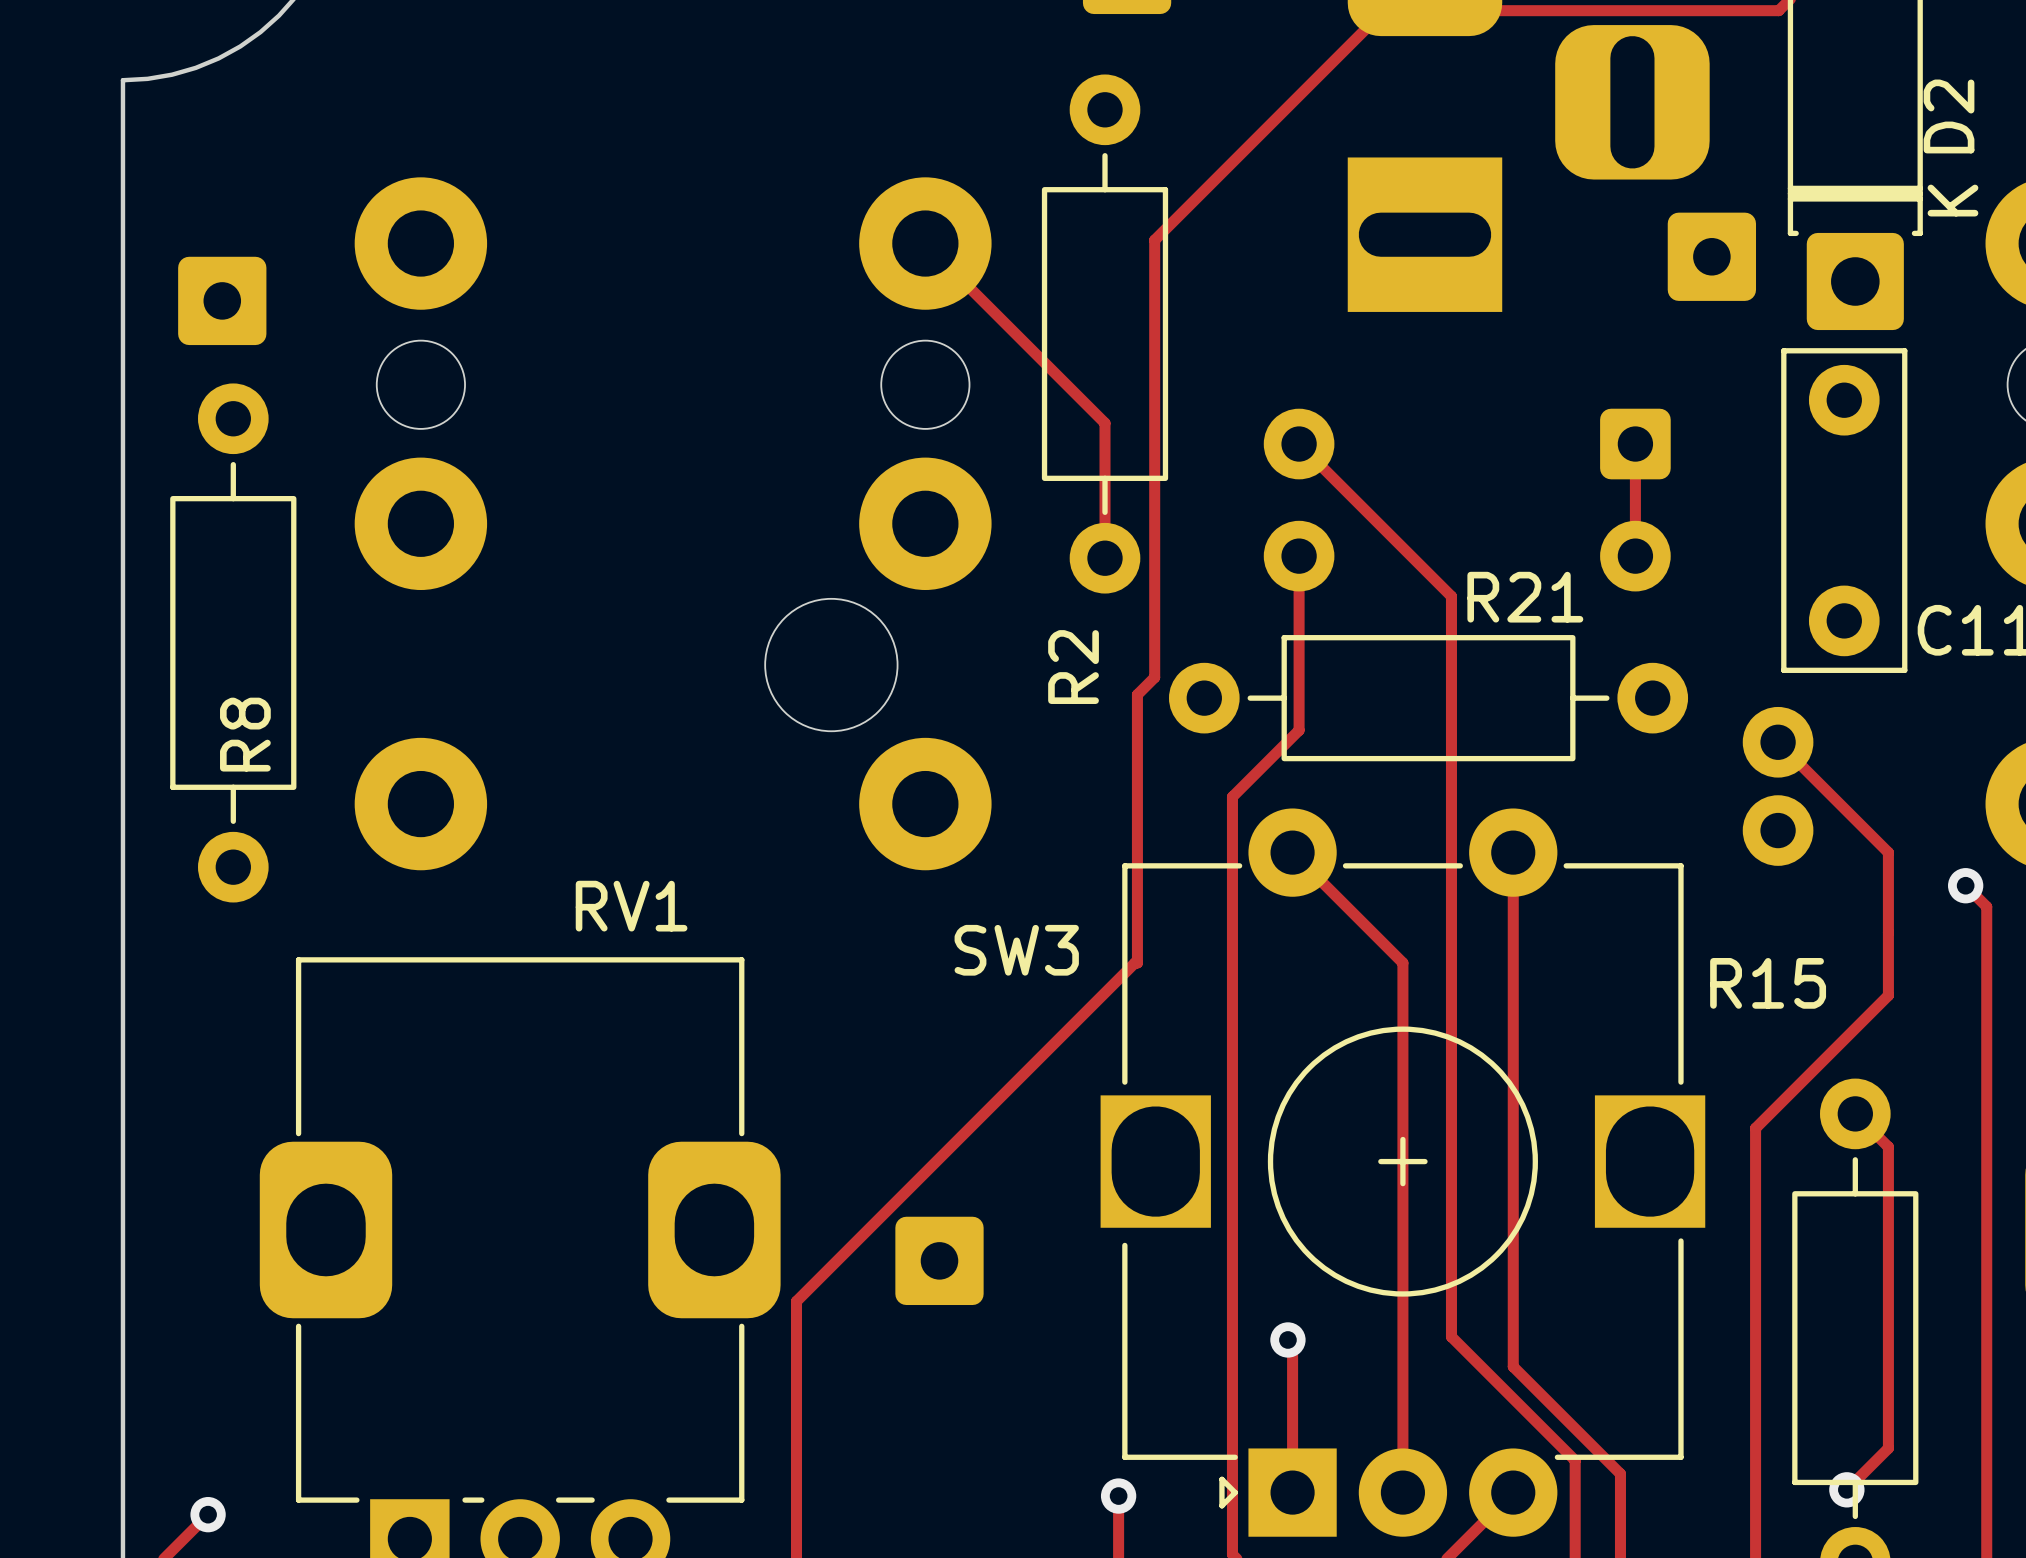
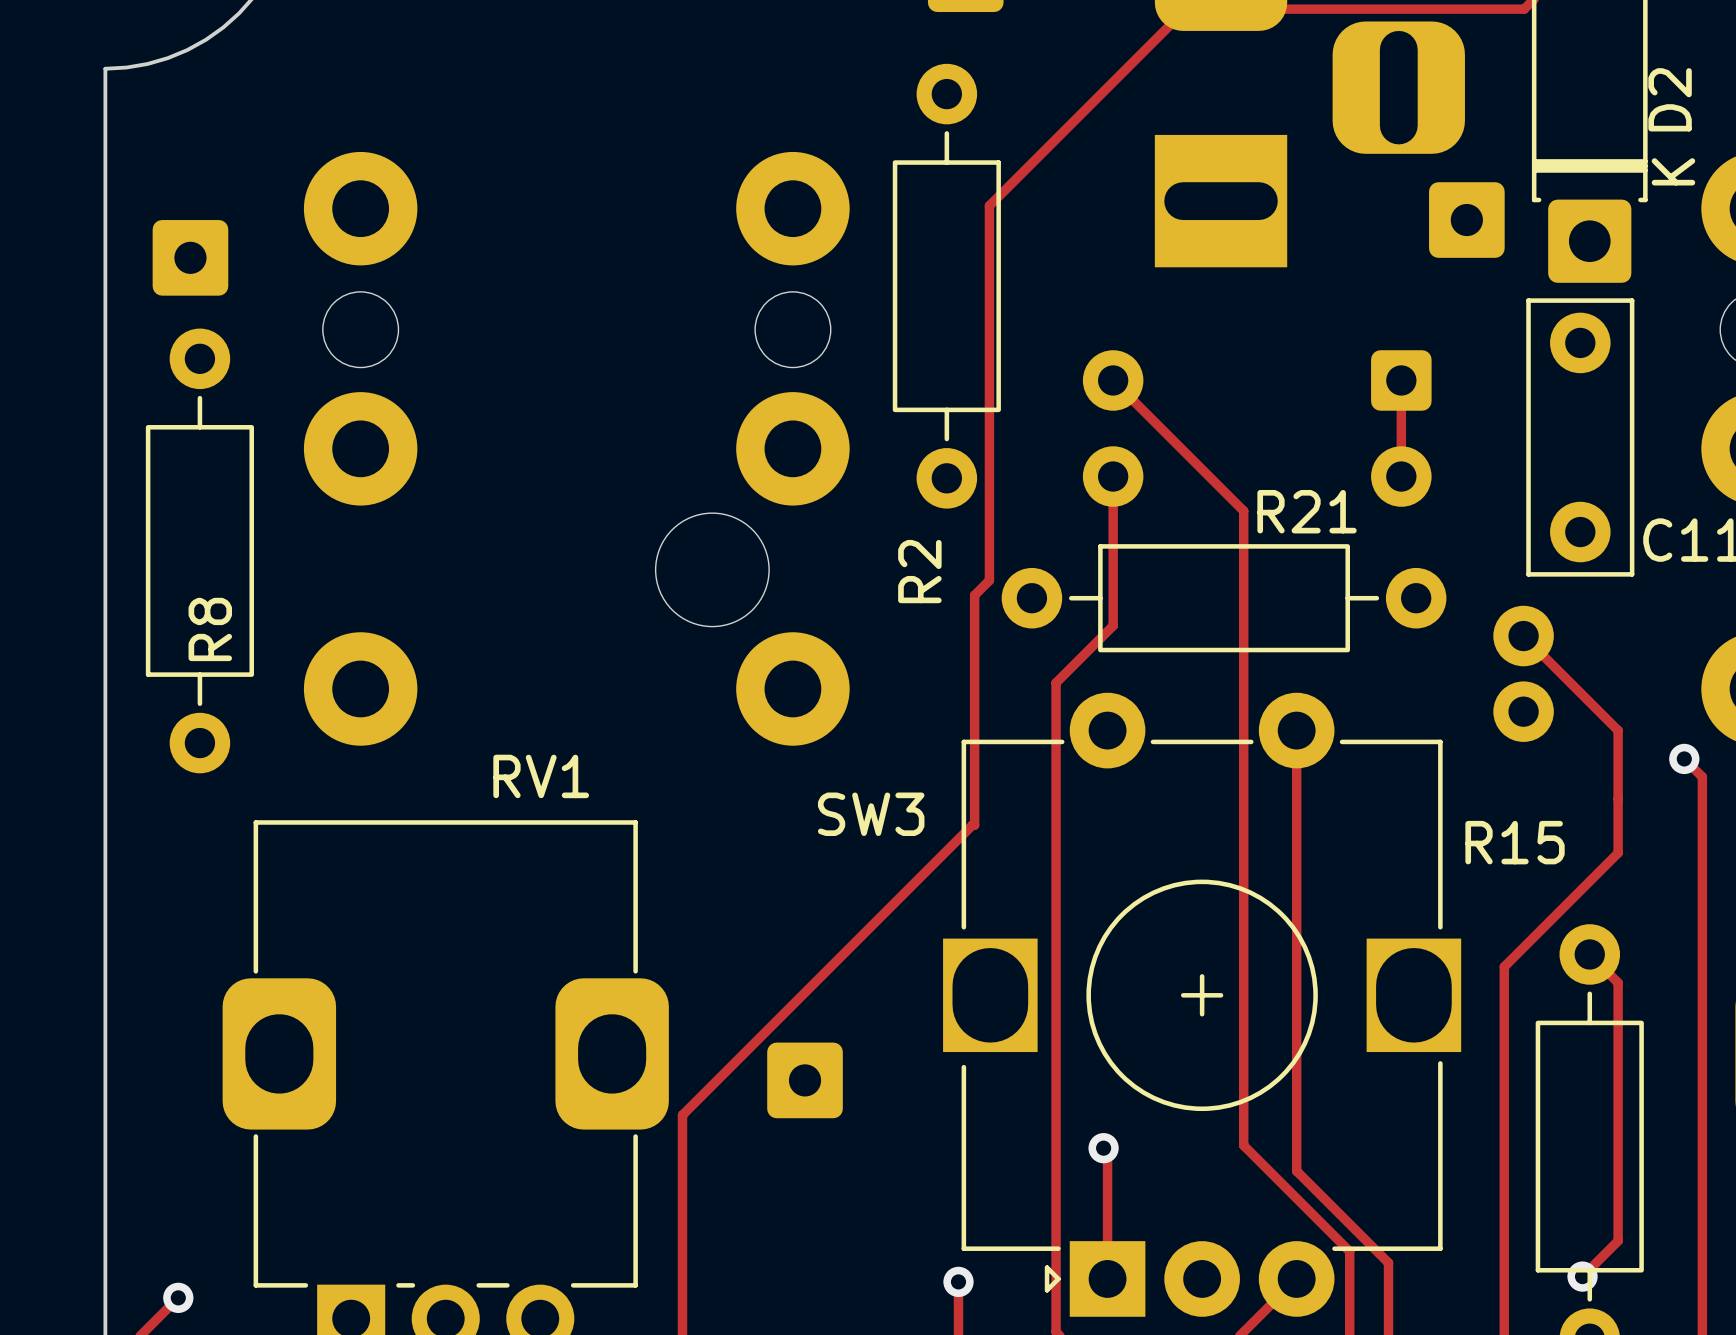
track: (925, 243) (1105, 423) (1105, 558) -> none
track: (1292, 852) (1402, 962) (1402, 1492) -> none

